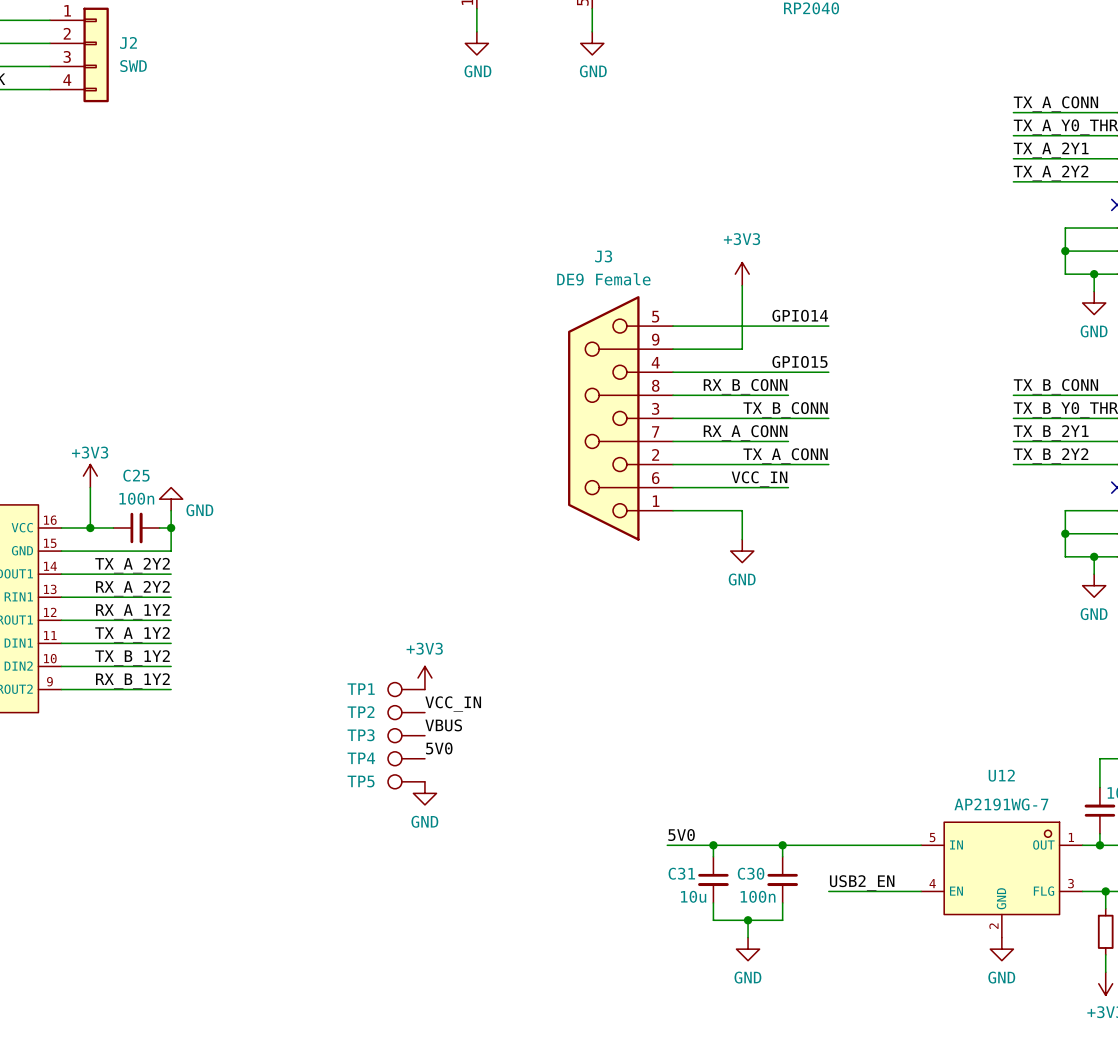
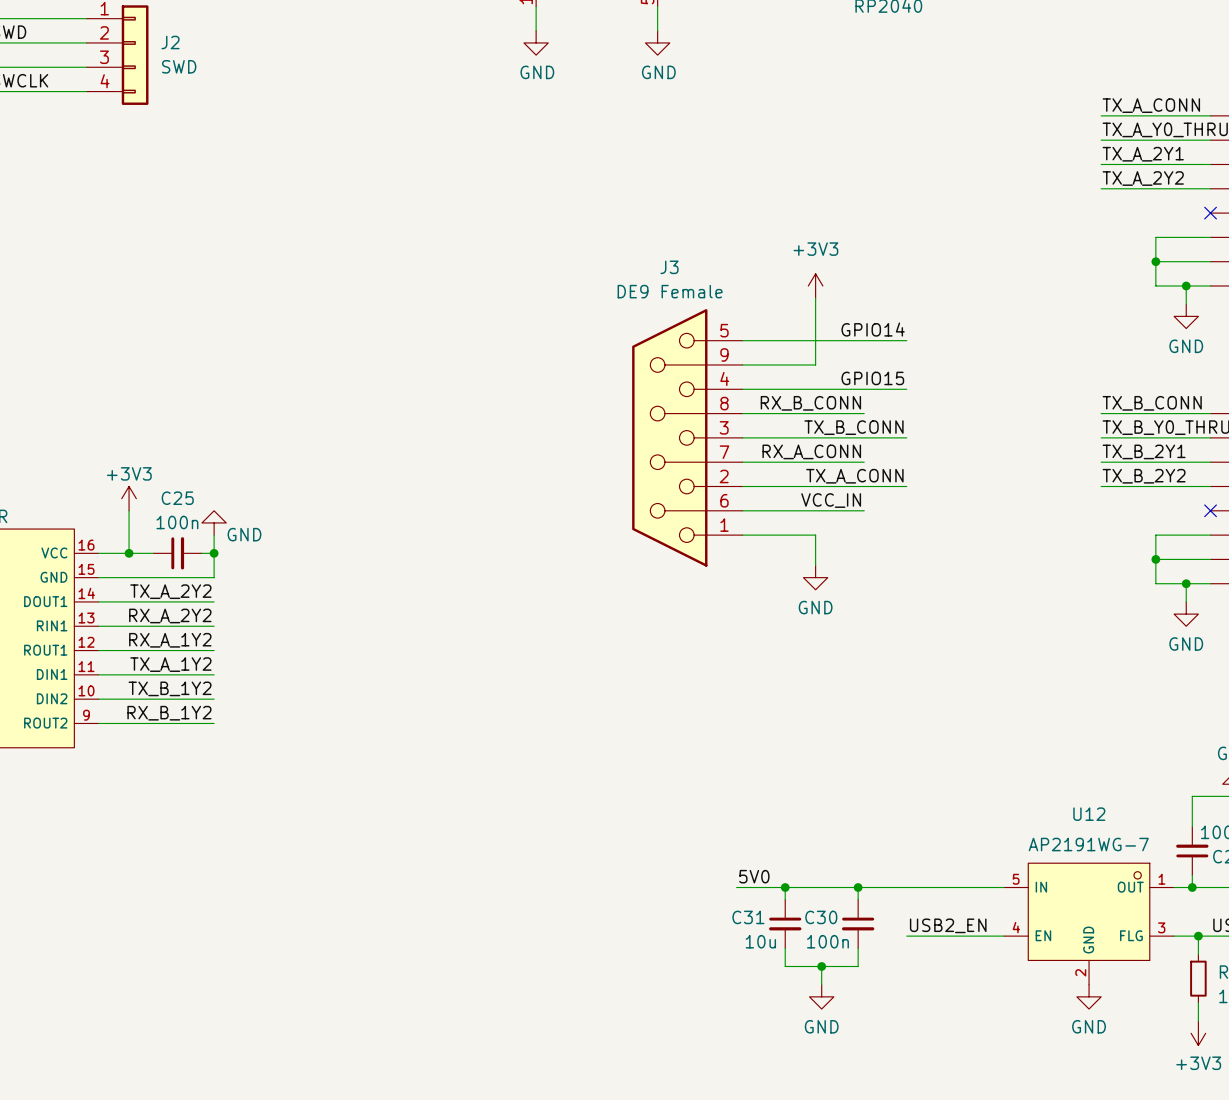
power symbol: +3V3 (424, 677) -> none
TP1: (406, 689) -> none
label: VCC_IN (453, 704) -> none
TP2: (406, 712) -> none
label: VBUS (443, 725) -> none
TP3: (406, 735) -> none
label: 5V0 (439, 748) -> none
TP4: (406, 758) -> none
TP5: (406, 781) -> none
power symbol: GND (424, 793) -> none

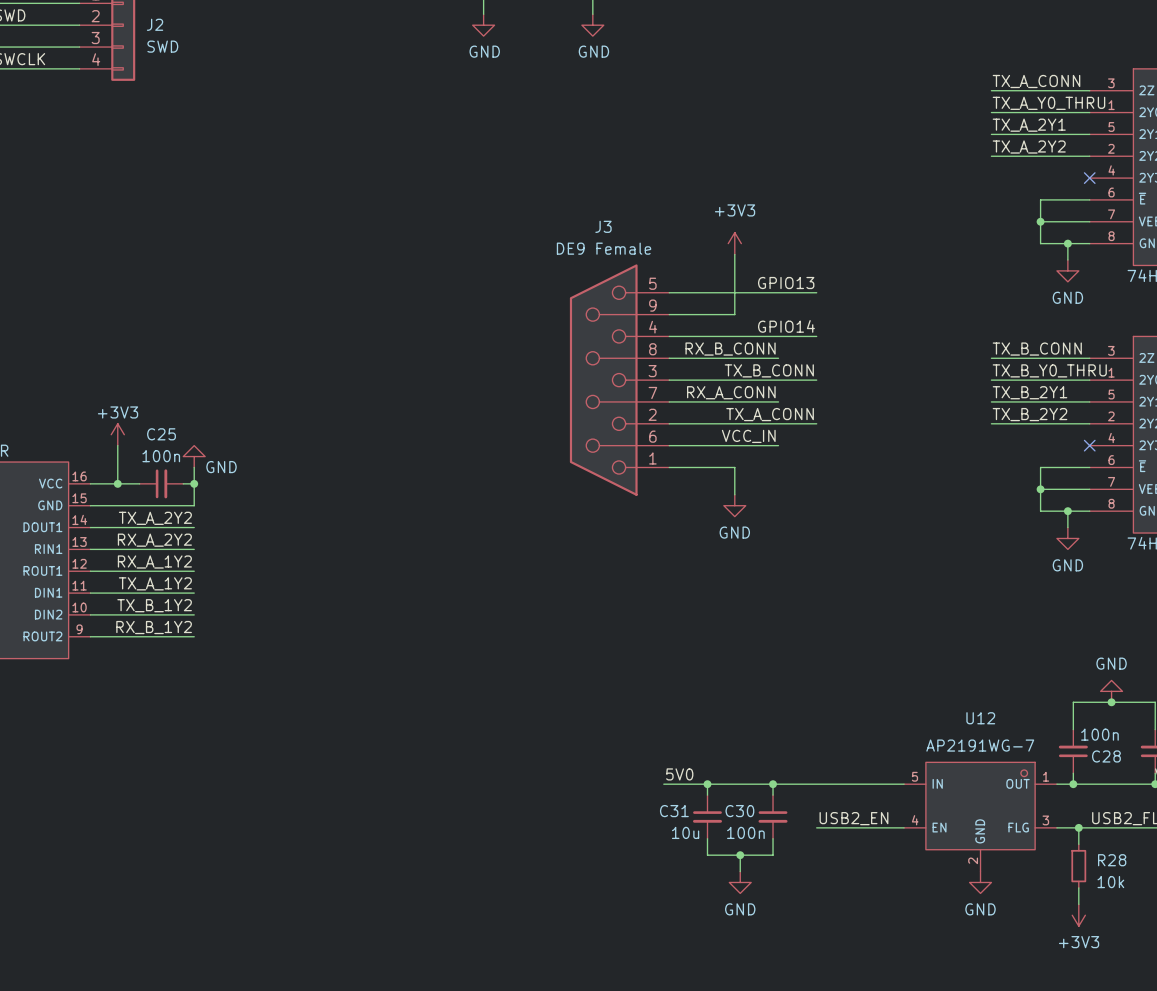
label: GPIO14 (873, 329) -> GPIO13 (786, 283)
label: GPIO15 (872, 378) -> GPIO14 (786, 326)

